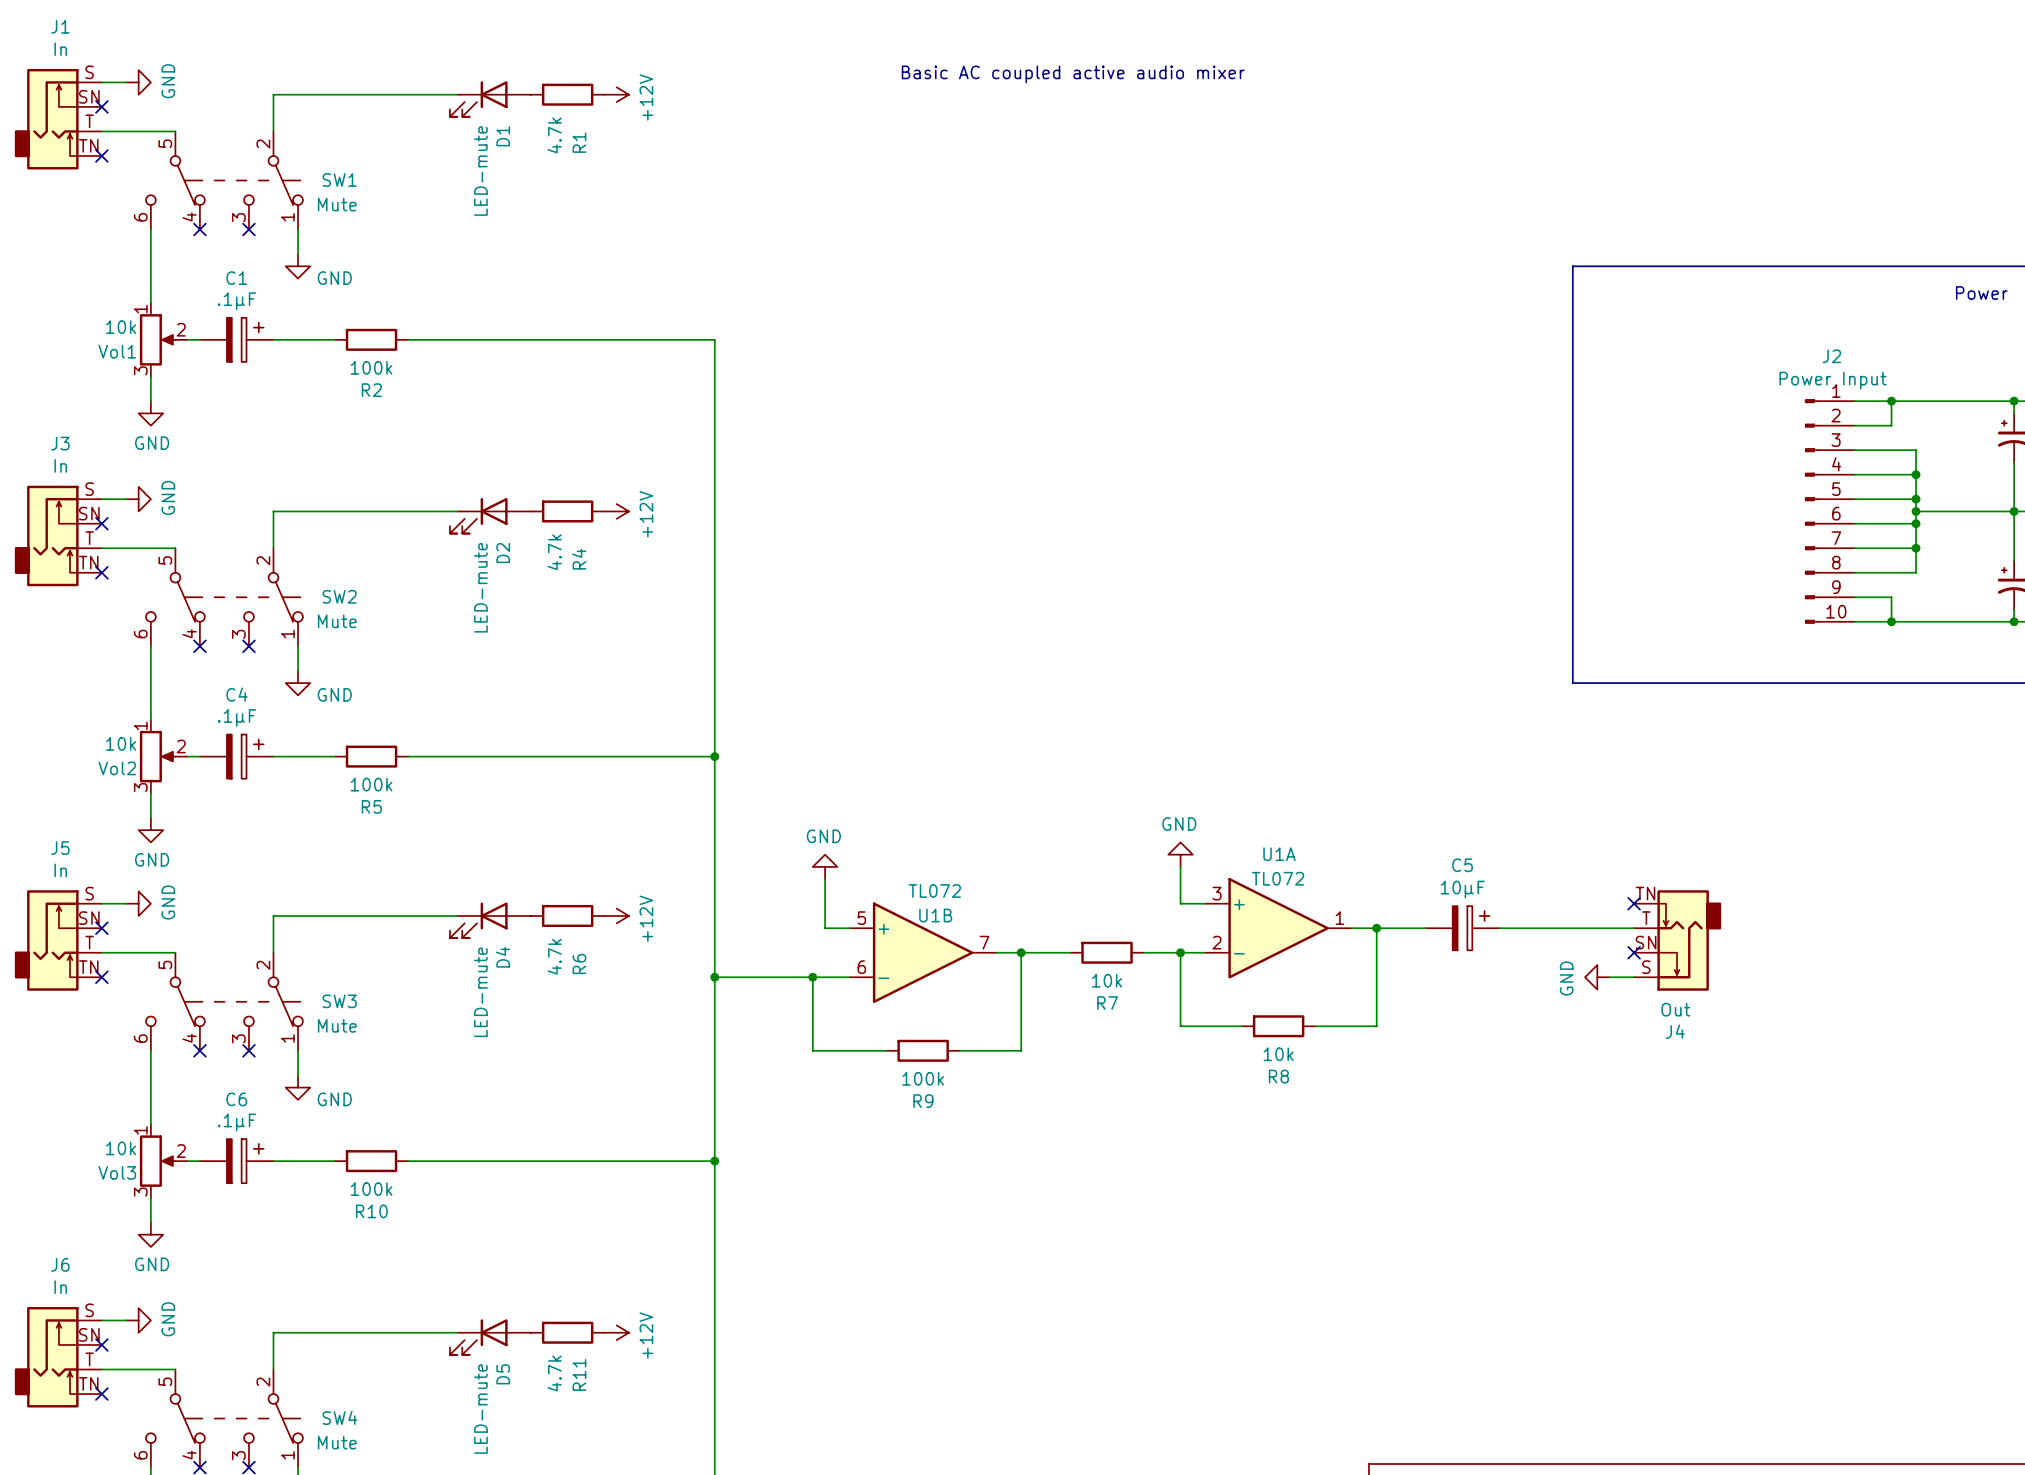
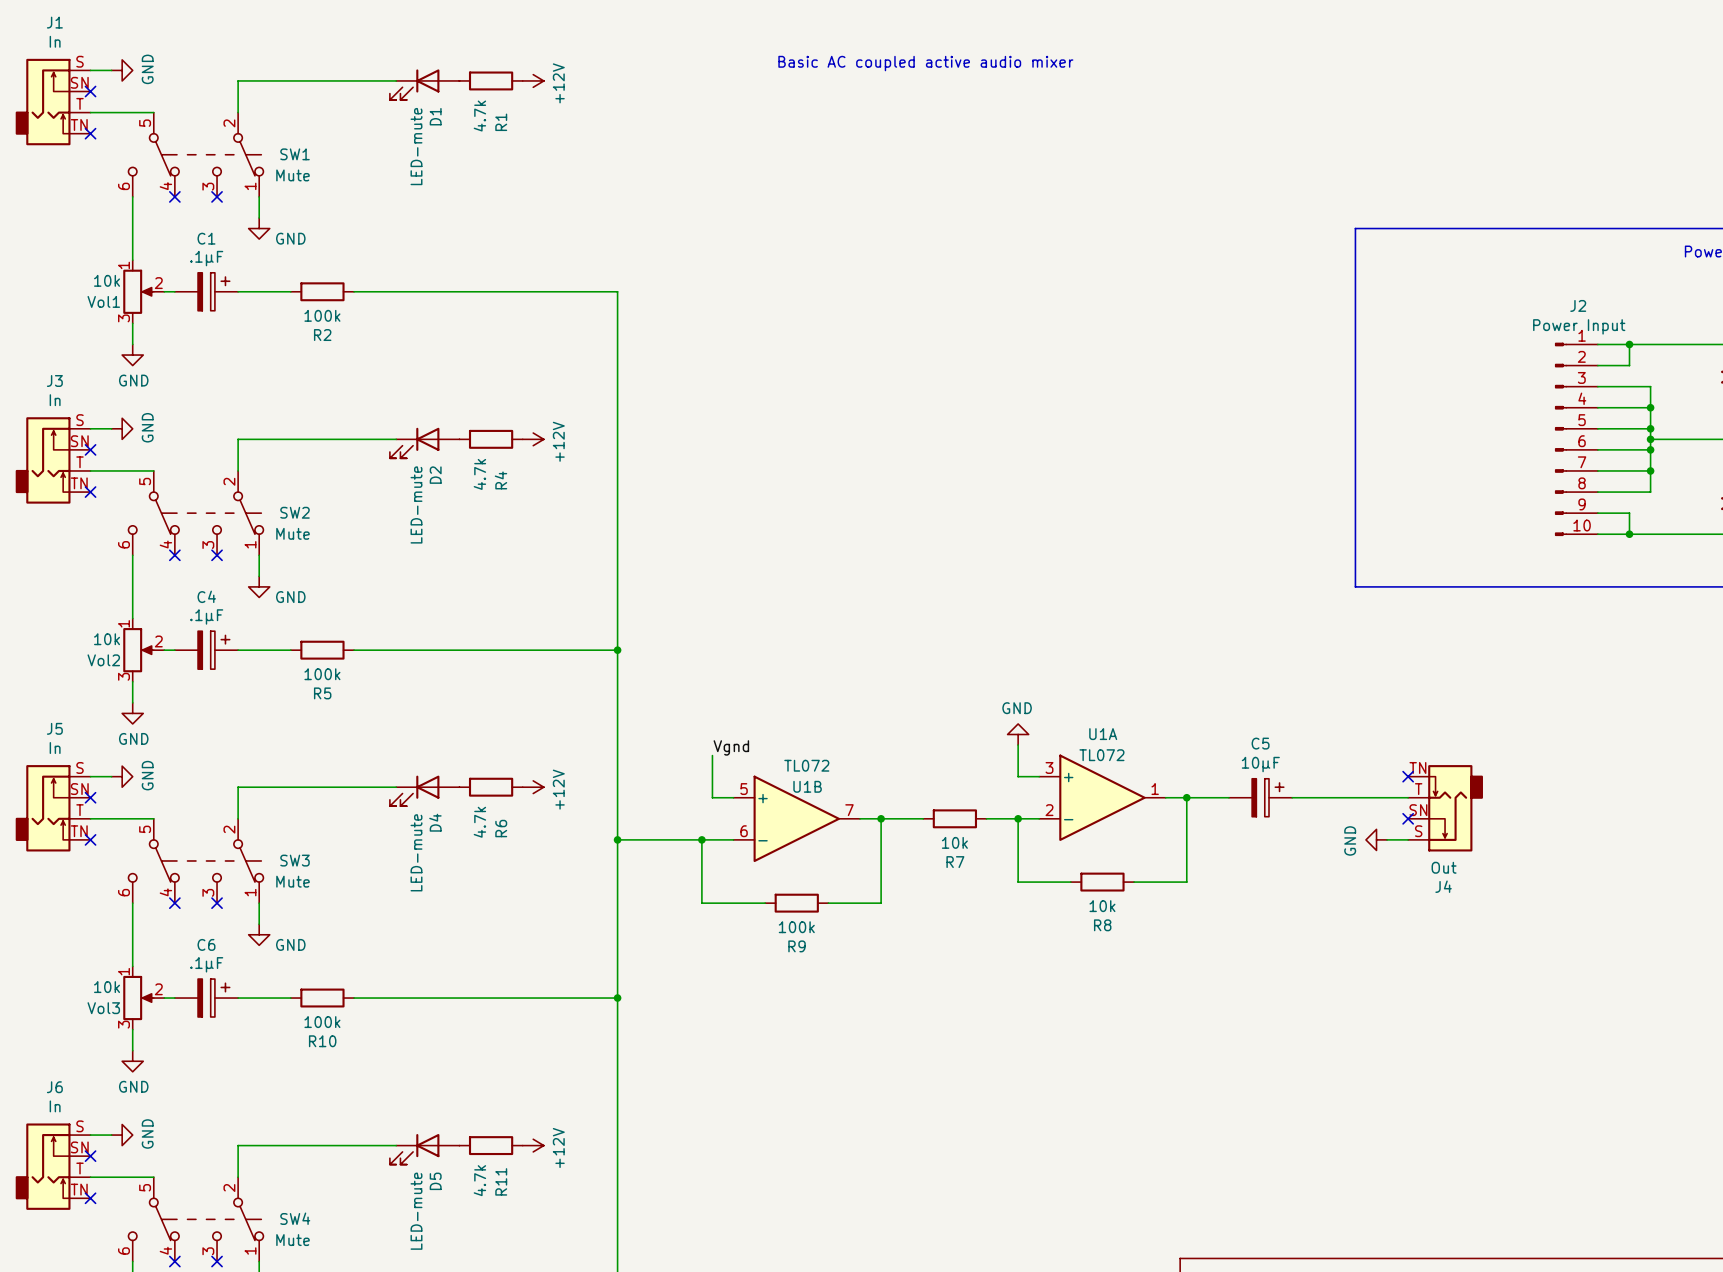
power symbol: GND (825, 866) -> none
label: none -> Vgnd (731, 747)

